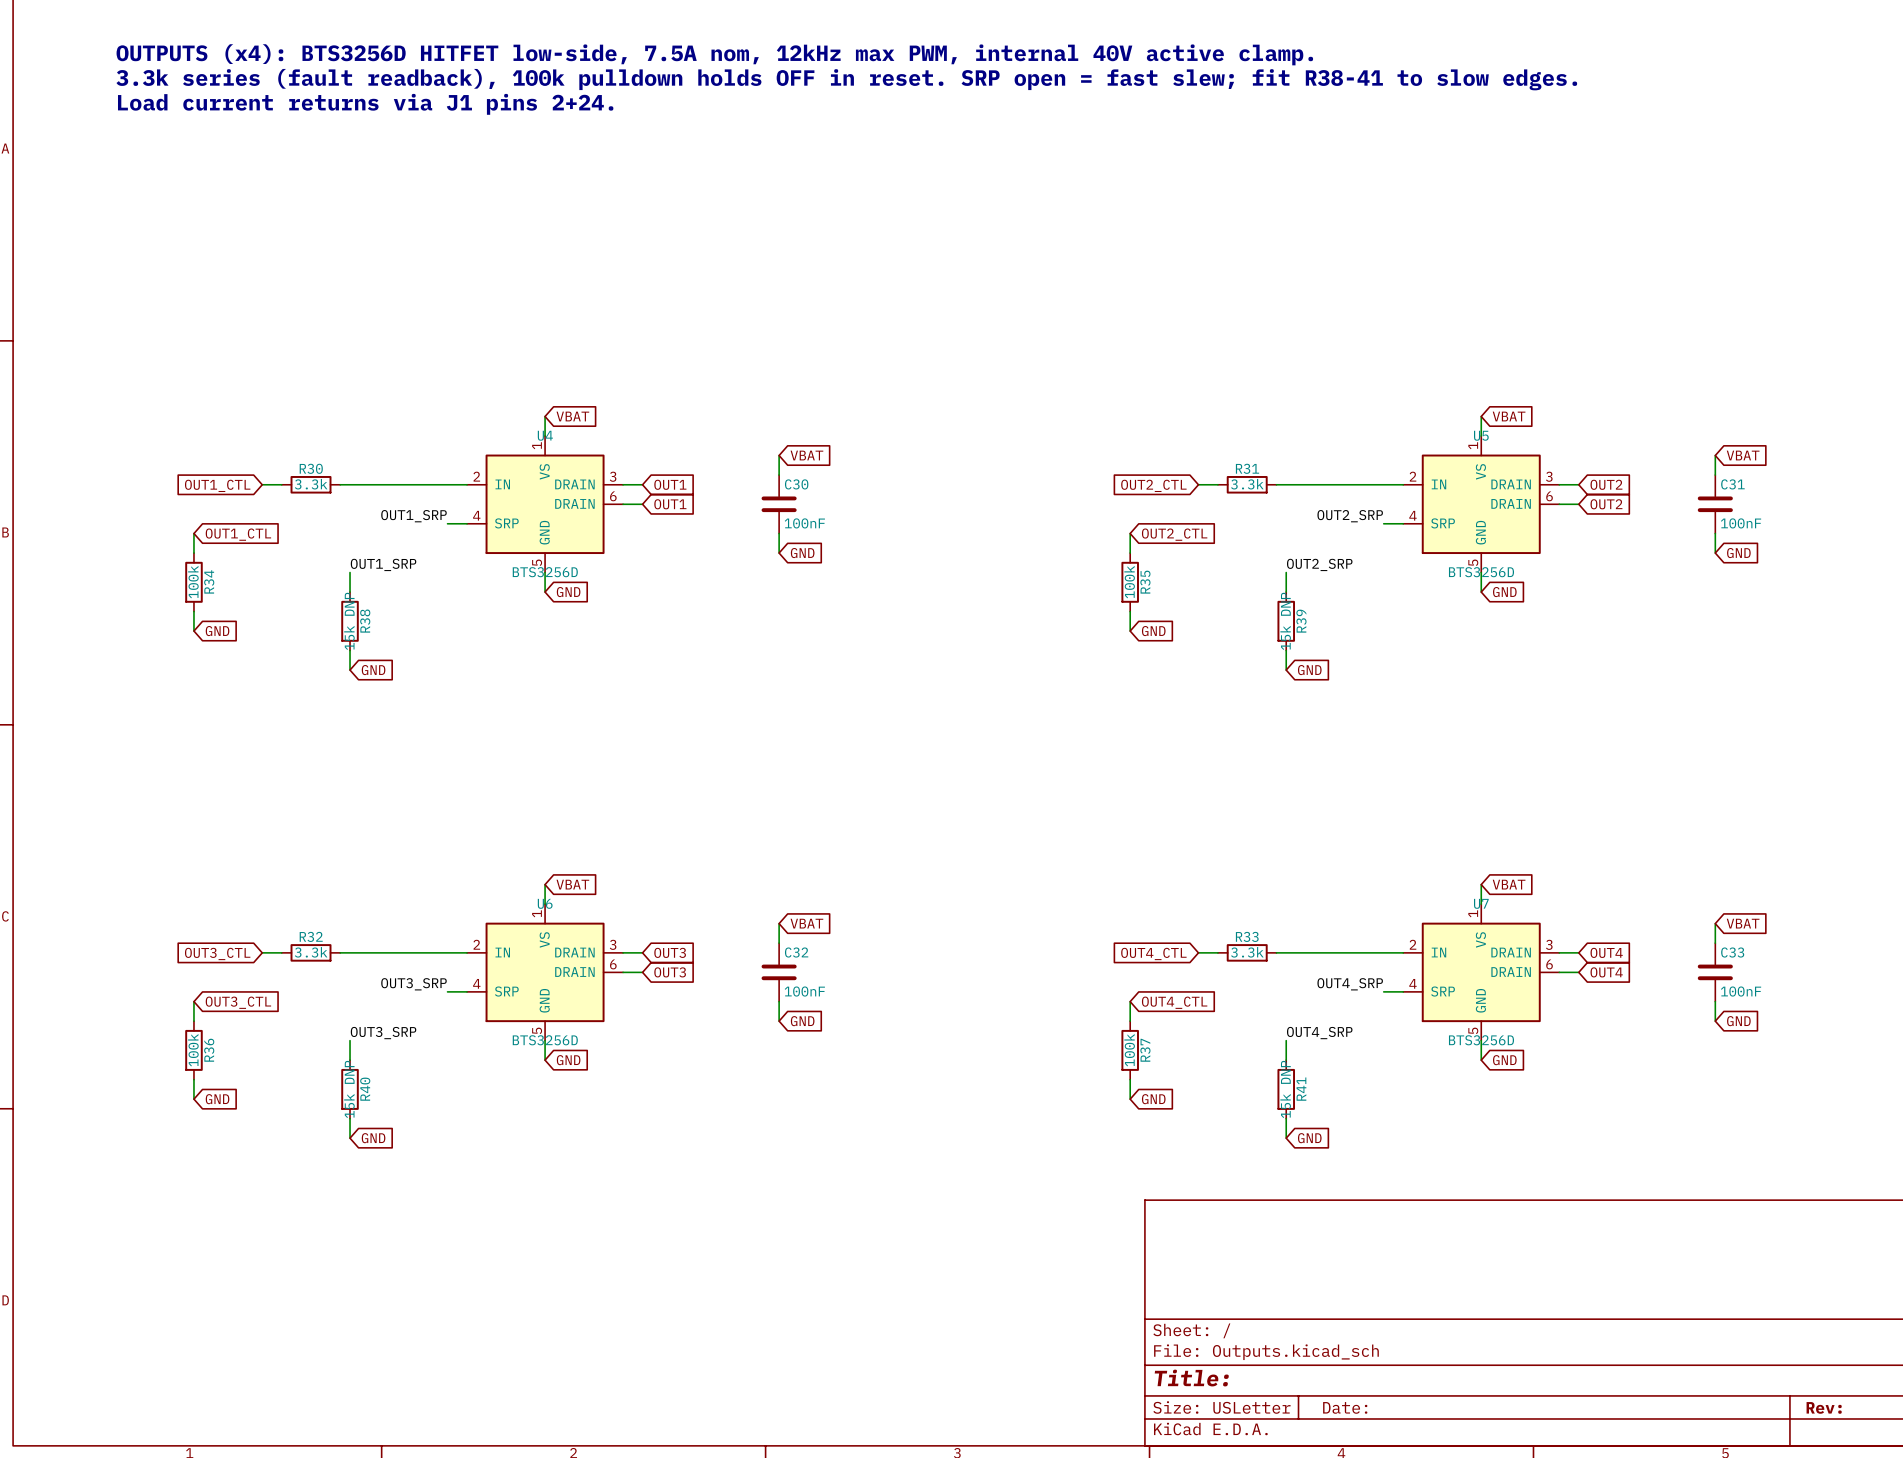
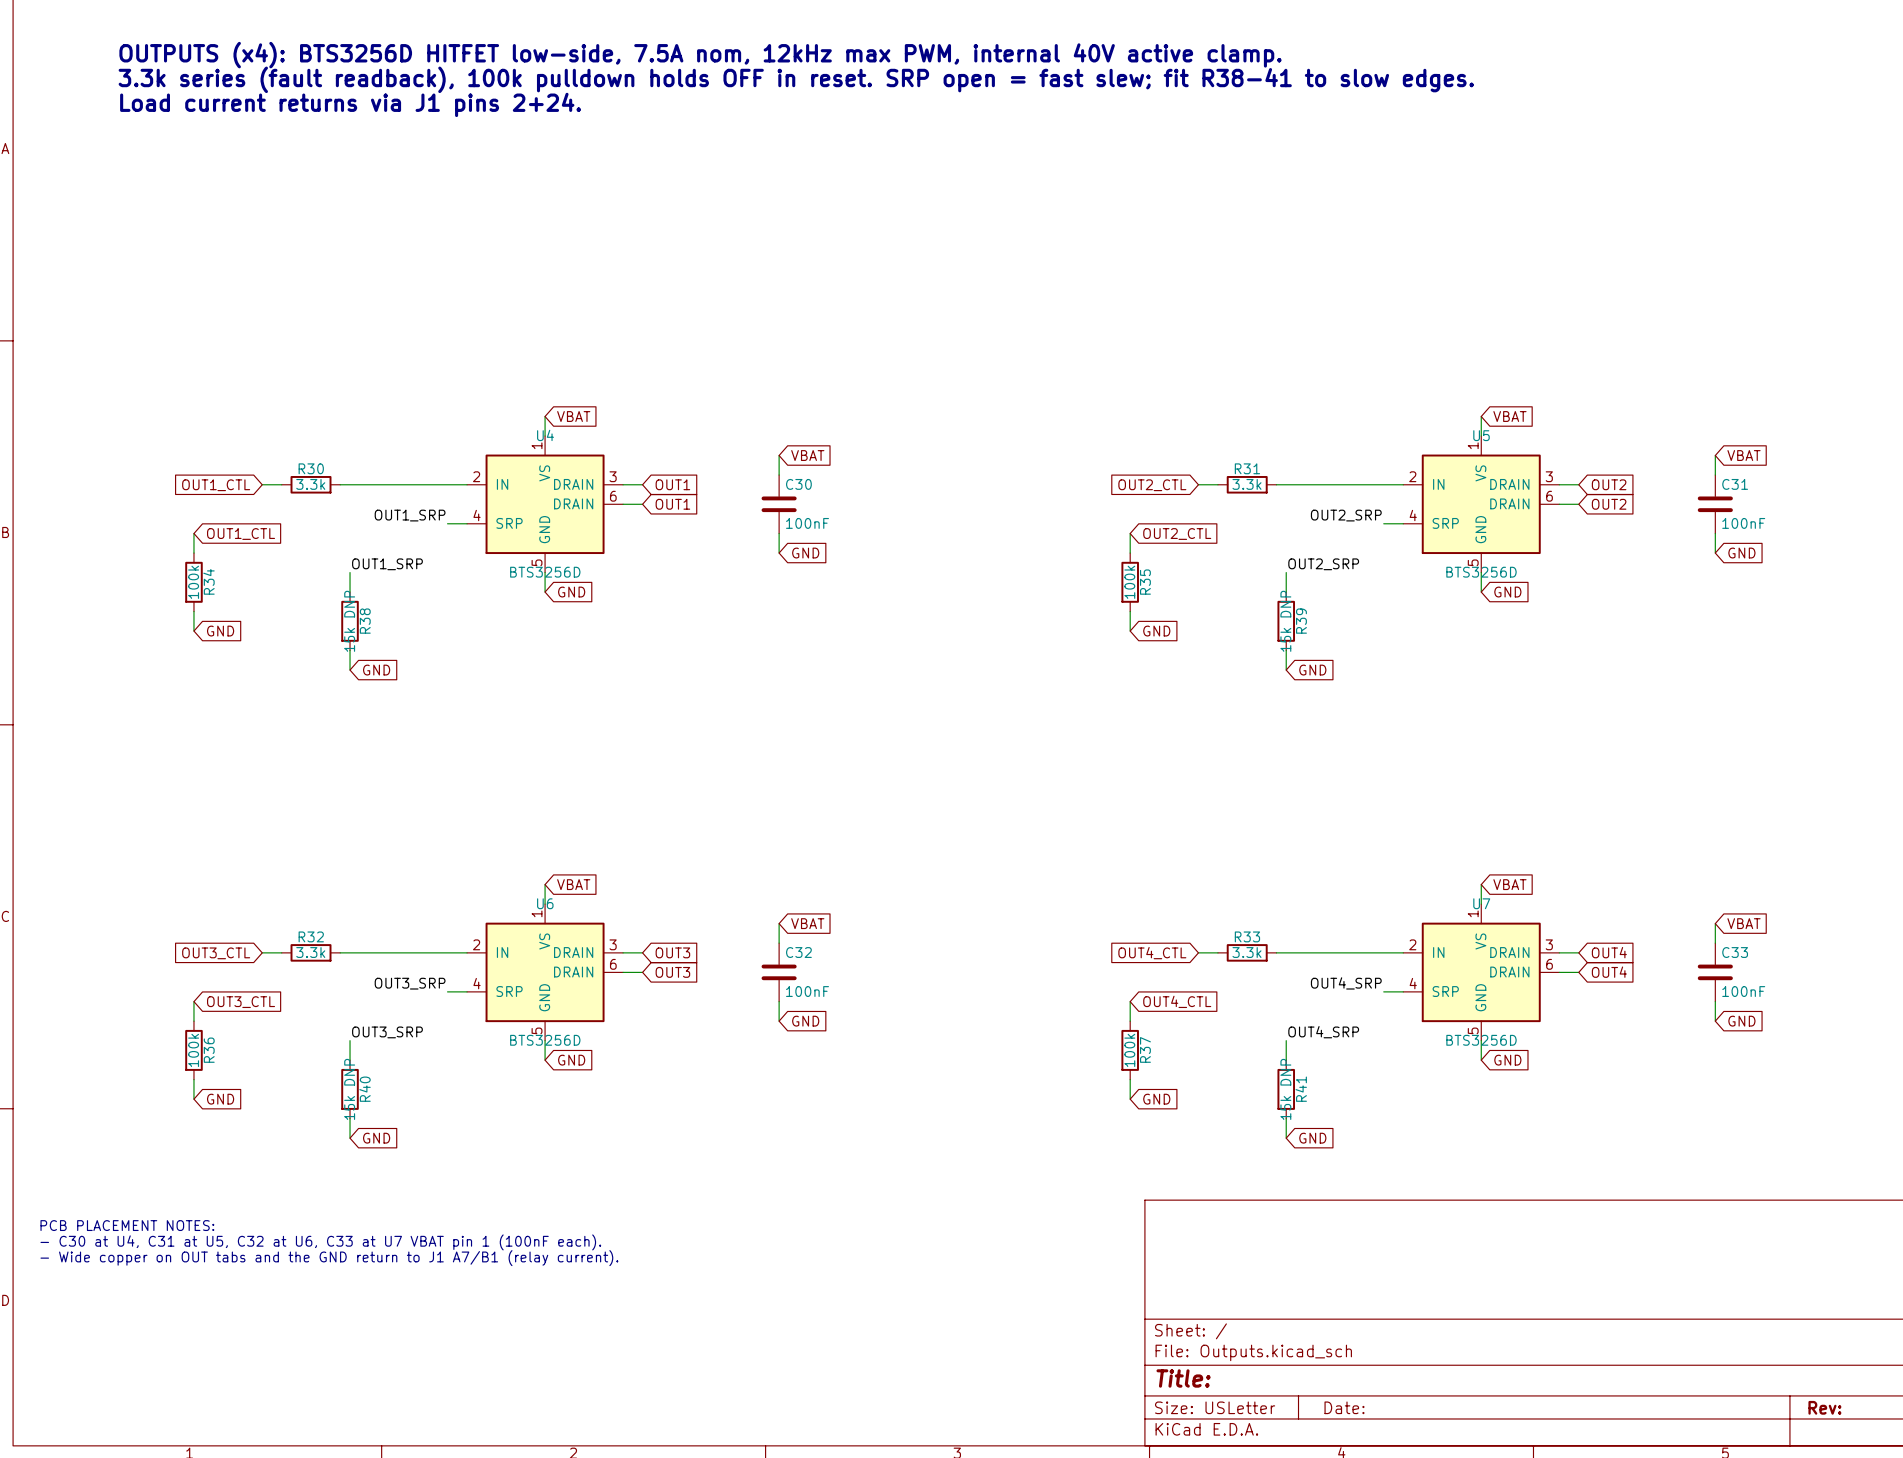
text: none -> PCB PLACEMENT NOTES: (127, 1225)
text: none -> - C30 at U4, C31 at U5, C32 at U6, C33 at U7 VBAT pin 1 (100nF each). (320, 1242)
text: none -> - Wide copper on OUT tabs and the GND return to J1 A7/B1 (relay current). (329, 1258)

